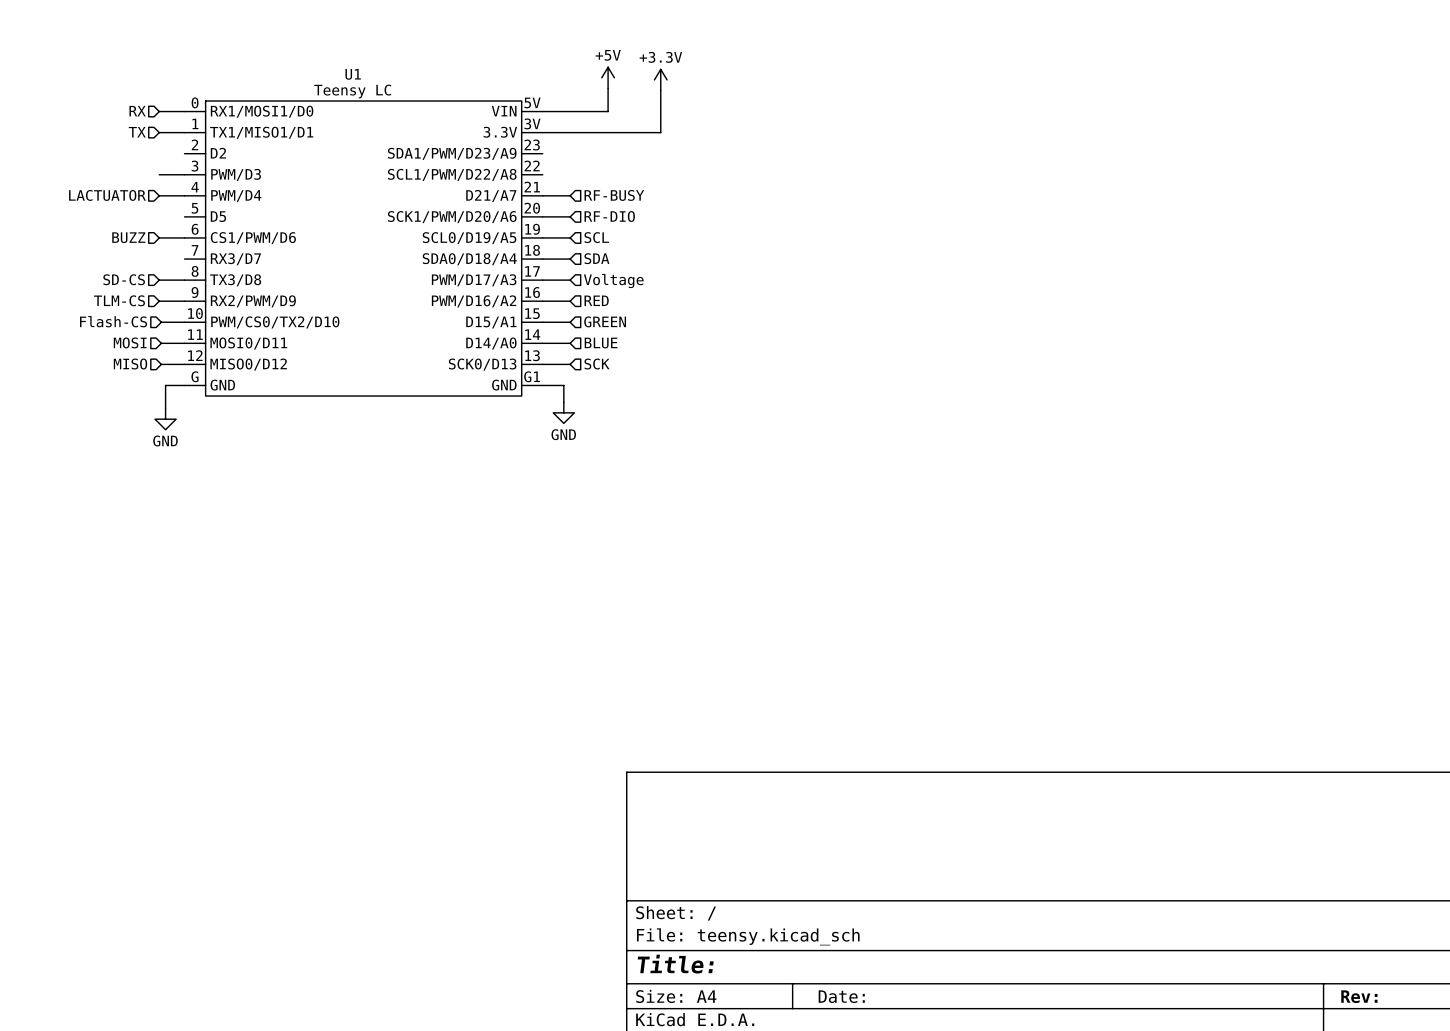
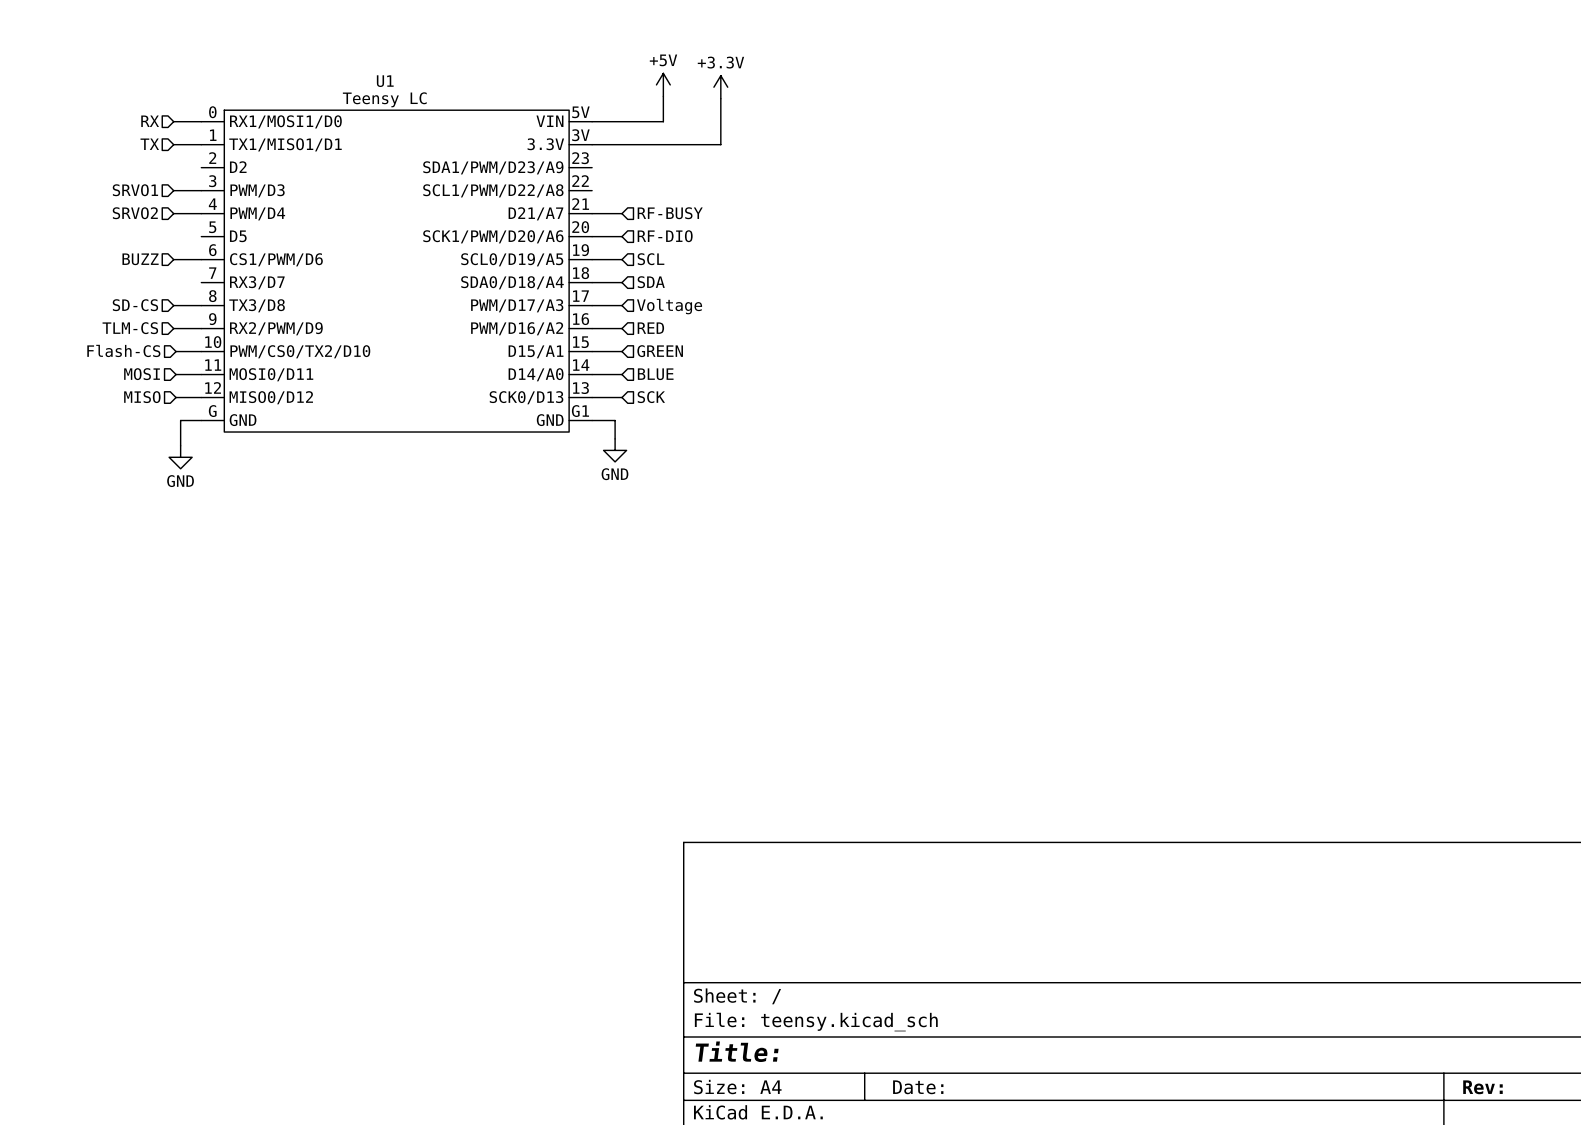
hierarchical label: none -> SRVO1 (135, 190)
hierarchical label: LACTUATOR (107, 195) -> SRVO2 (135, 213)

